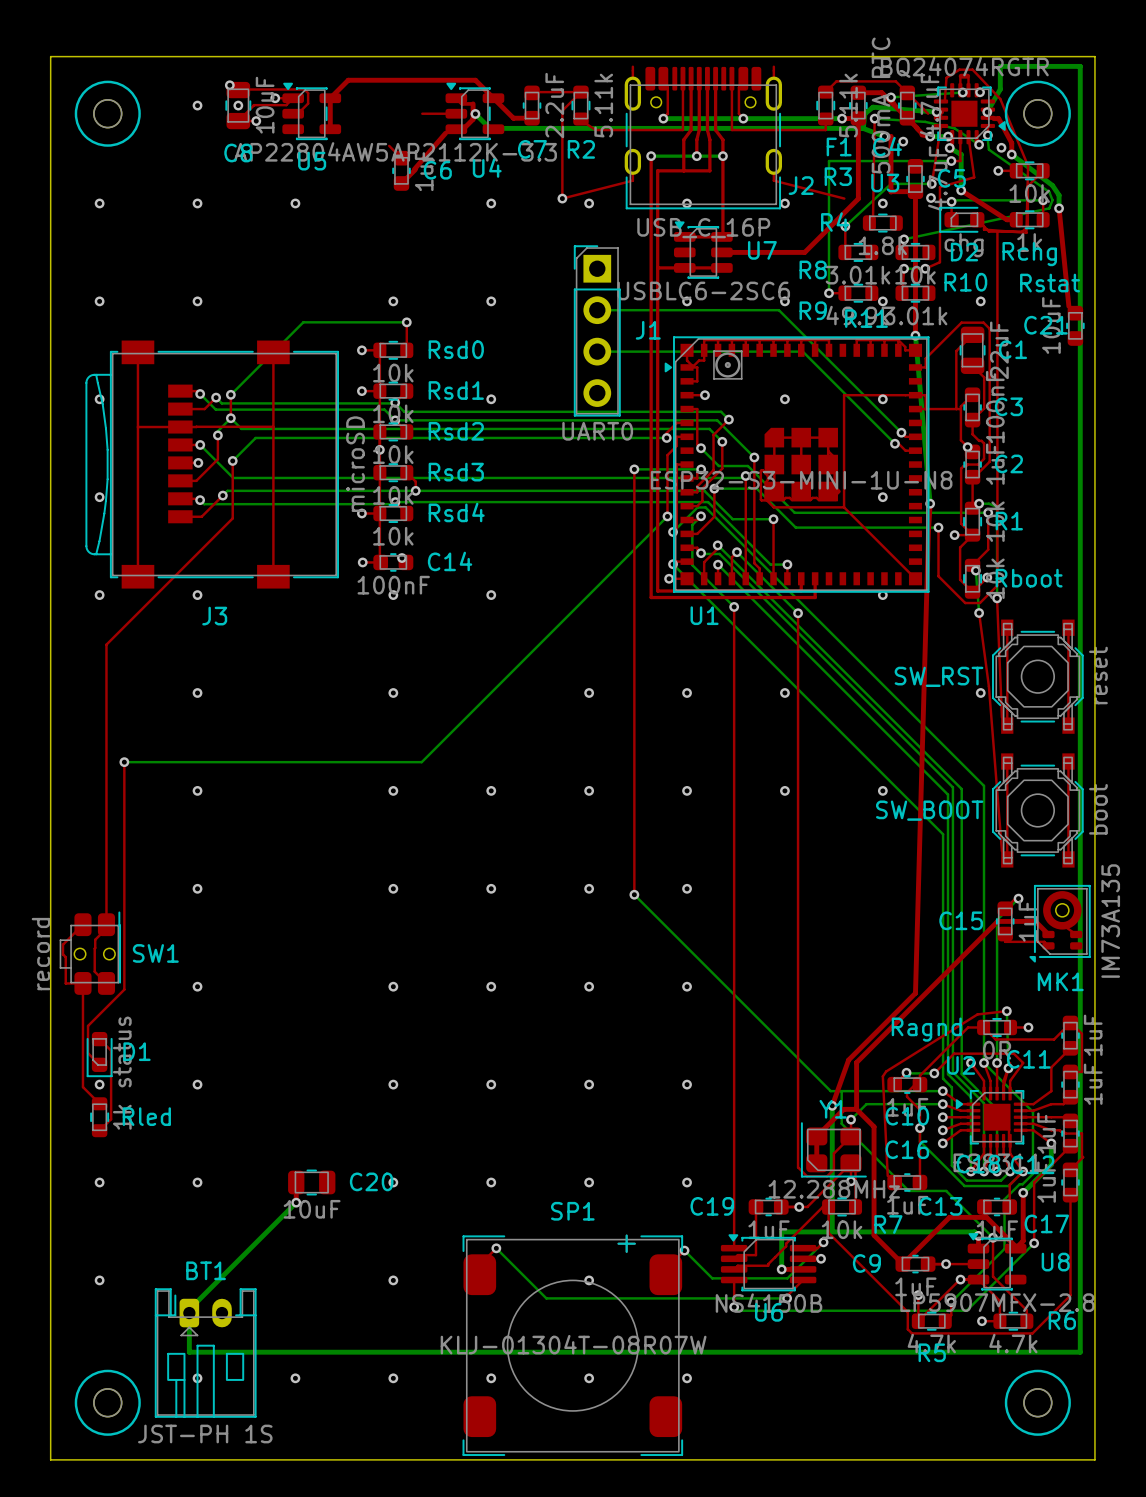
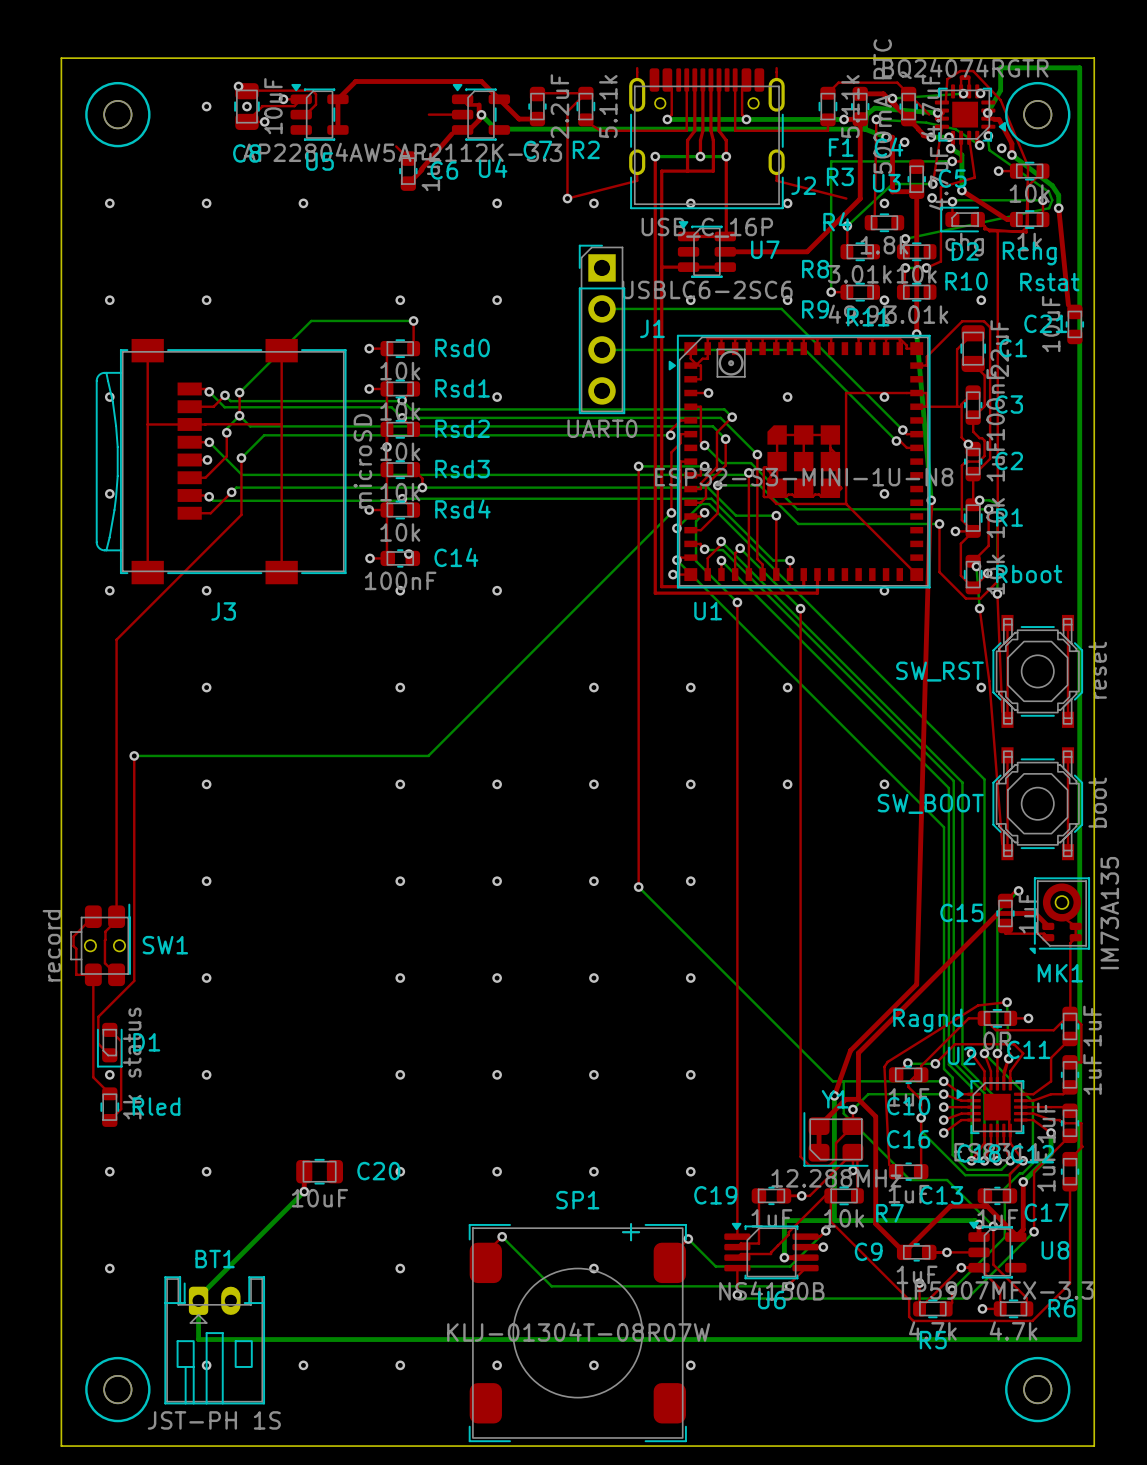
top track: none -> (1075, 926) (1075, 937) (1070, 943) (1070, 1013)
U8 value: LP5907MFX-2.8 (997, 1302) -> LP5907MFX-3.3 (997, 1290)

